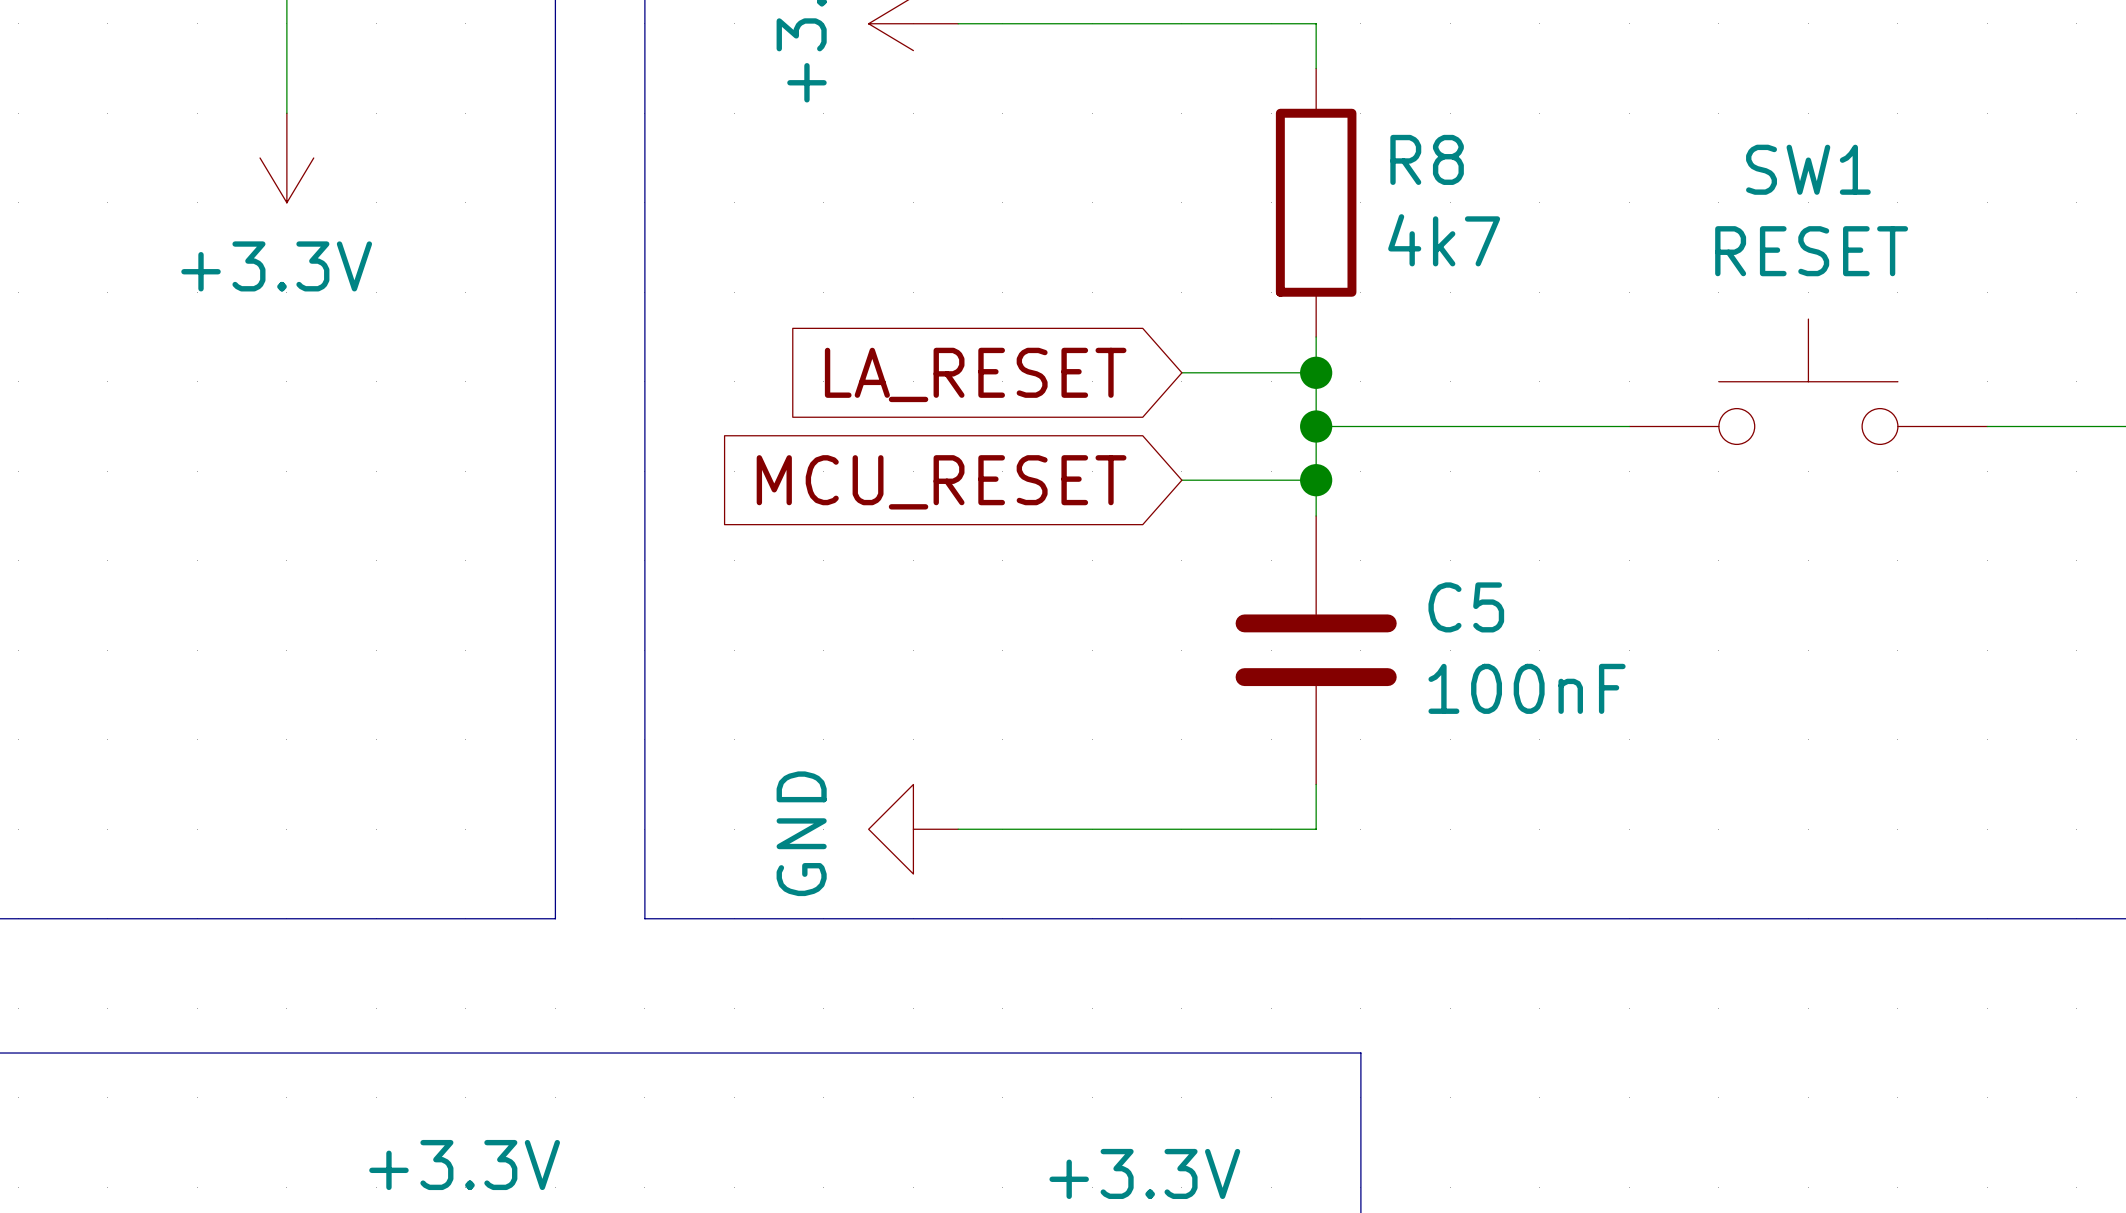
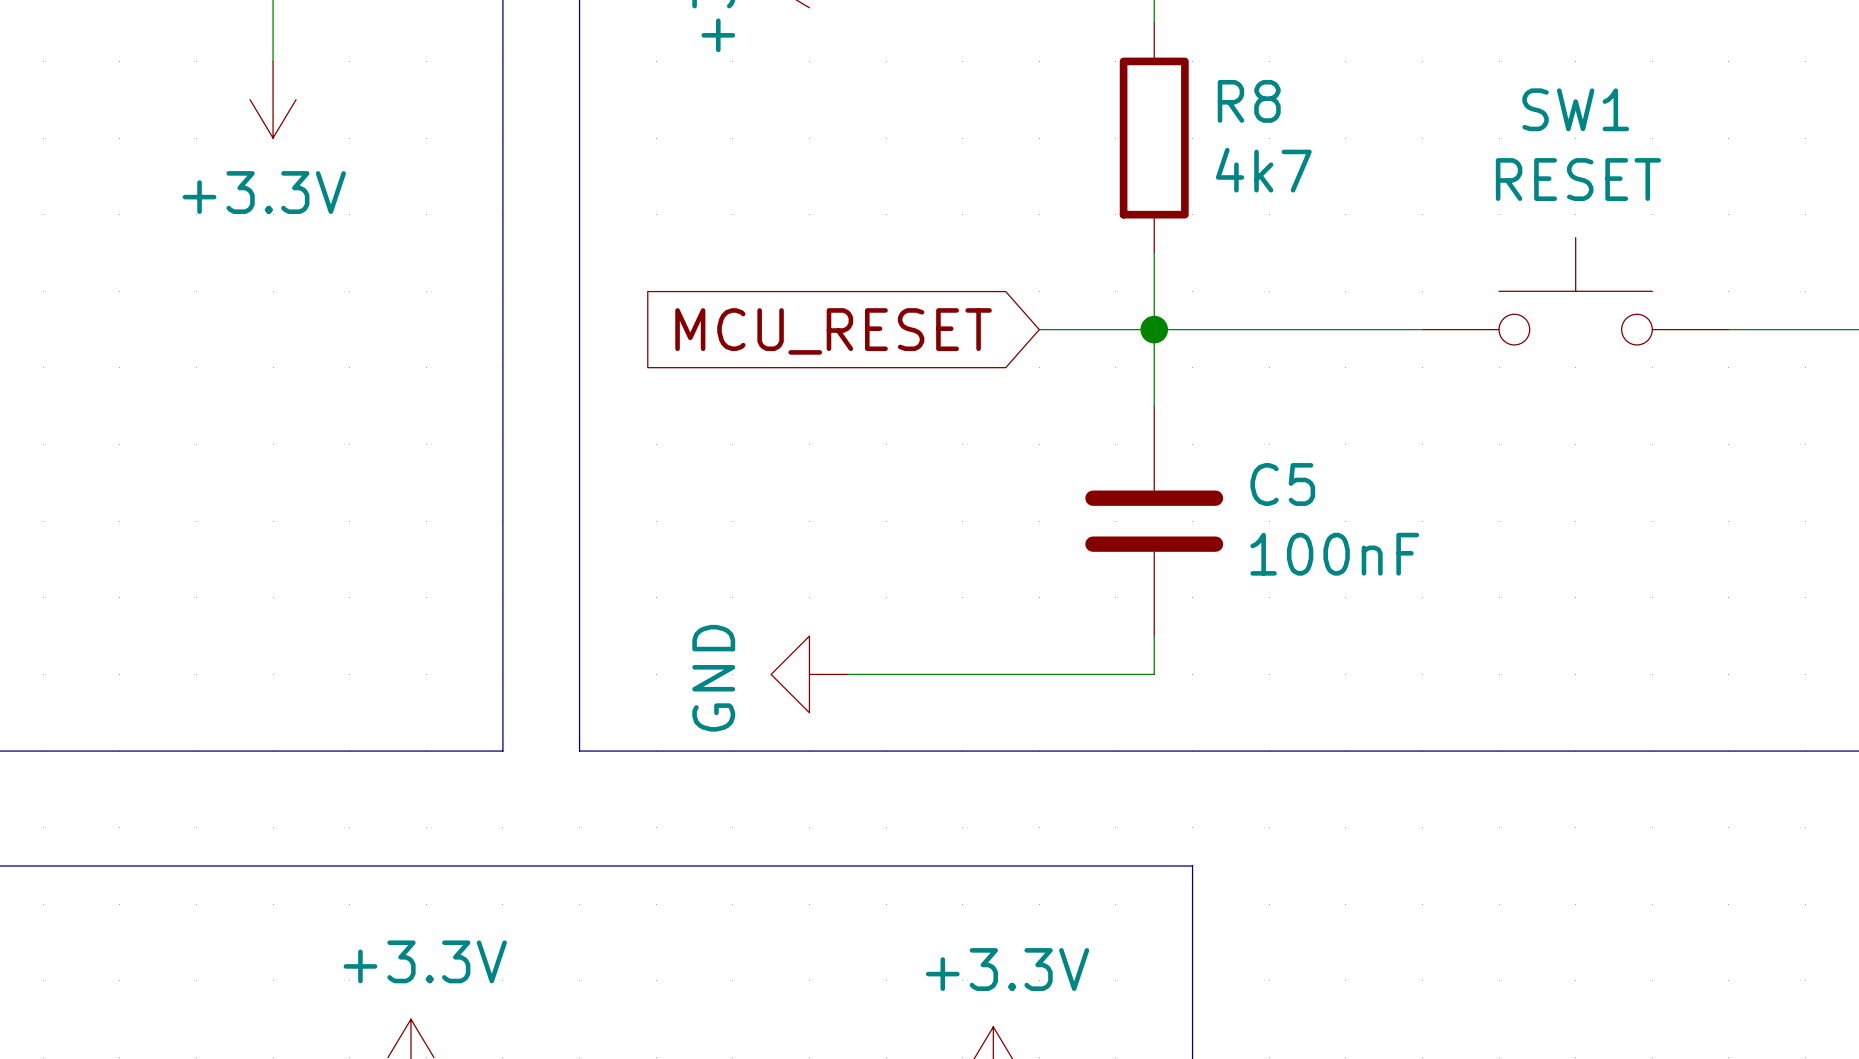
wire: (1181, 372) (1316, 372) -> (1039, 329) (1154, 329)
junction: (1316, 372) -> none
global label: LA_RESET (975, 374) -> none
wire: (1181, 480) (1316, 480) -> none
junction: (1316, 480) -> none
global label position: MCU_RESET (941, 482) -> MCU_RESET (833, 331)

